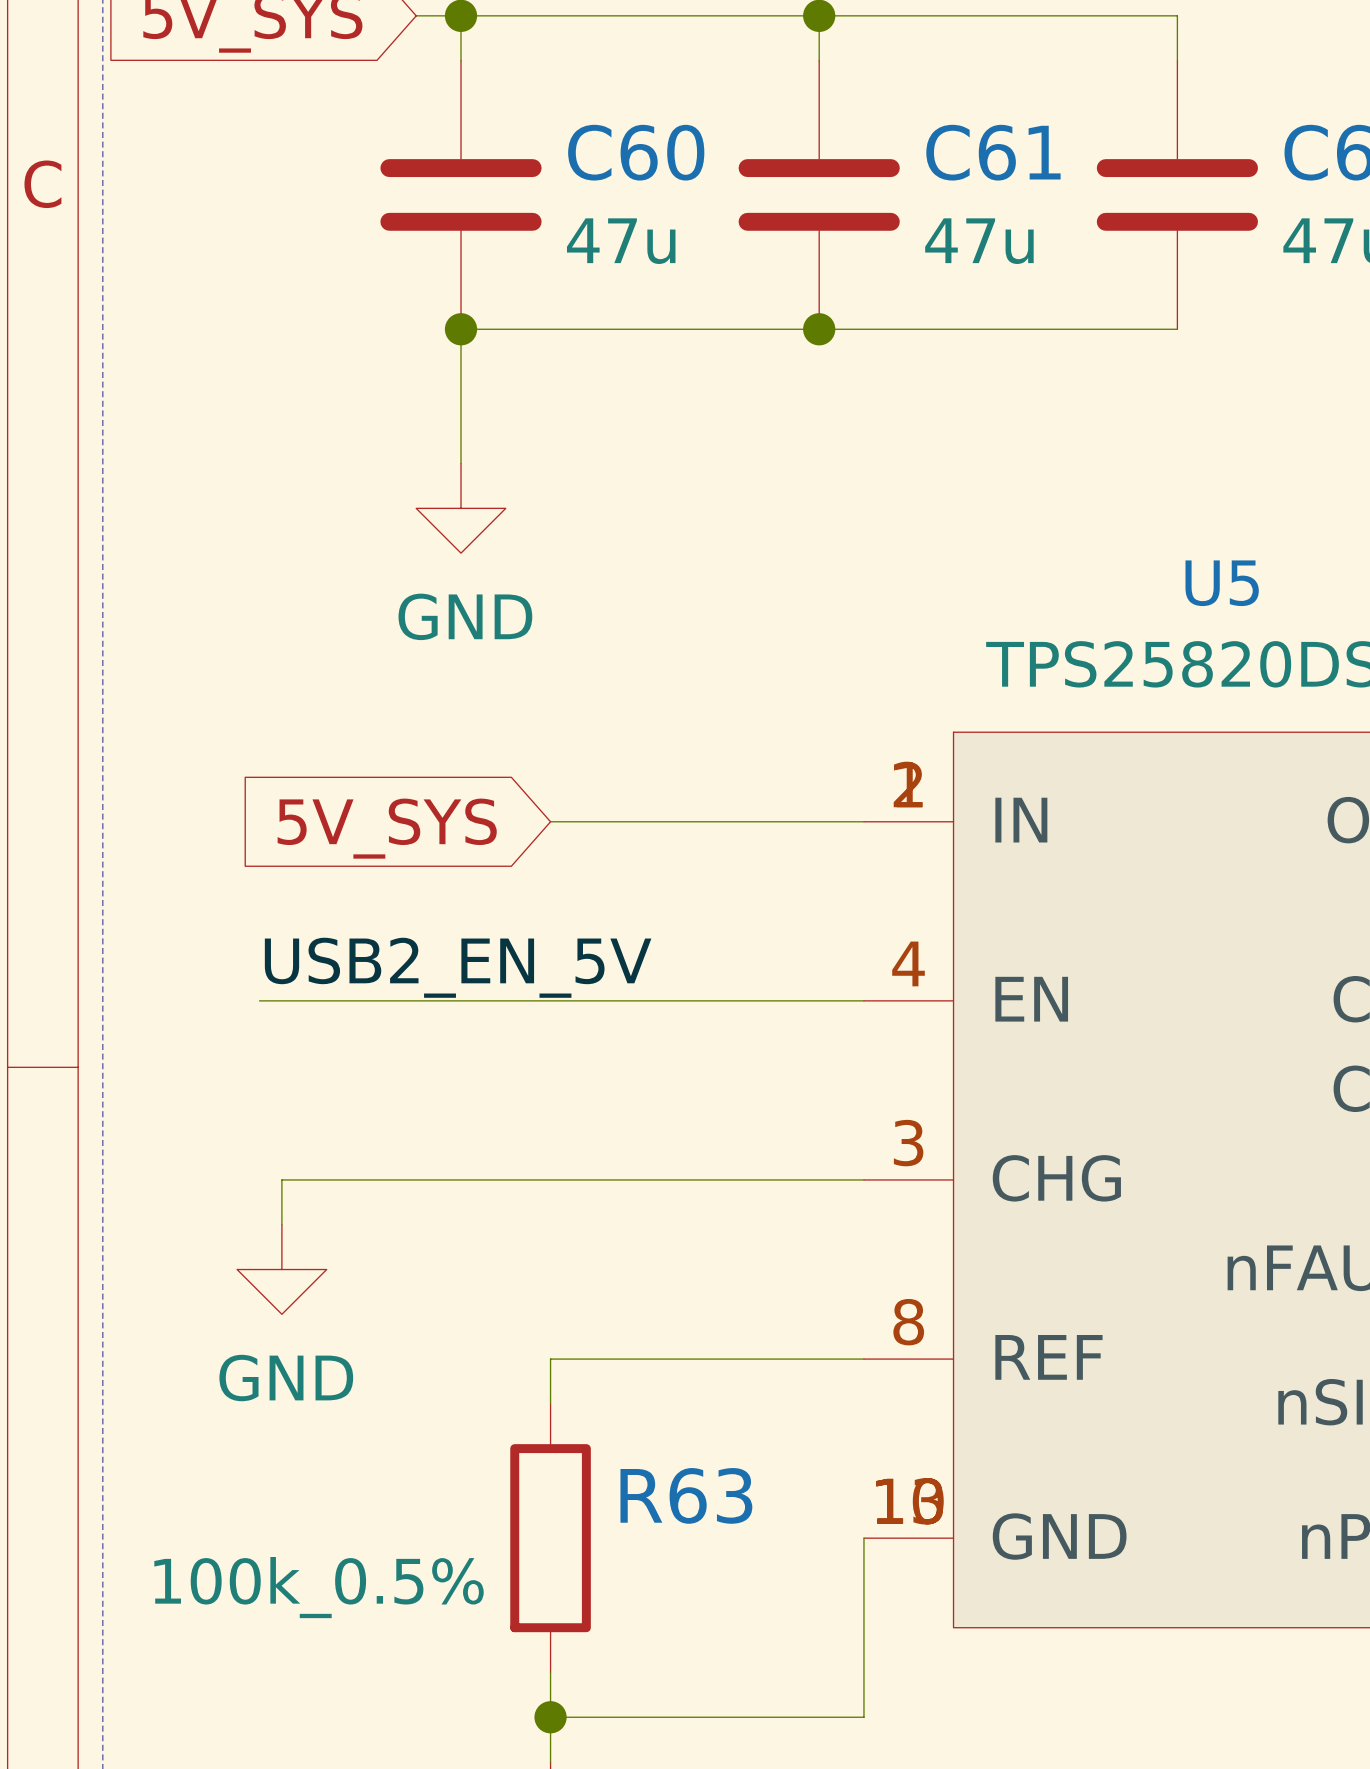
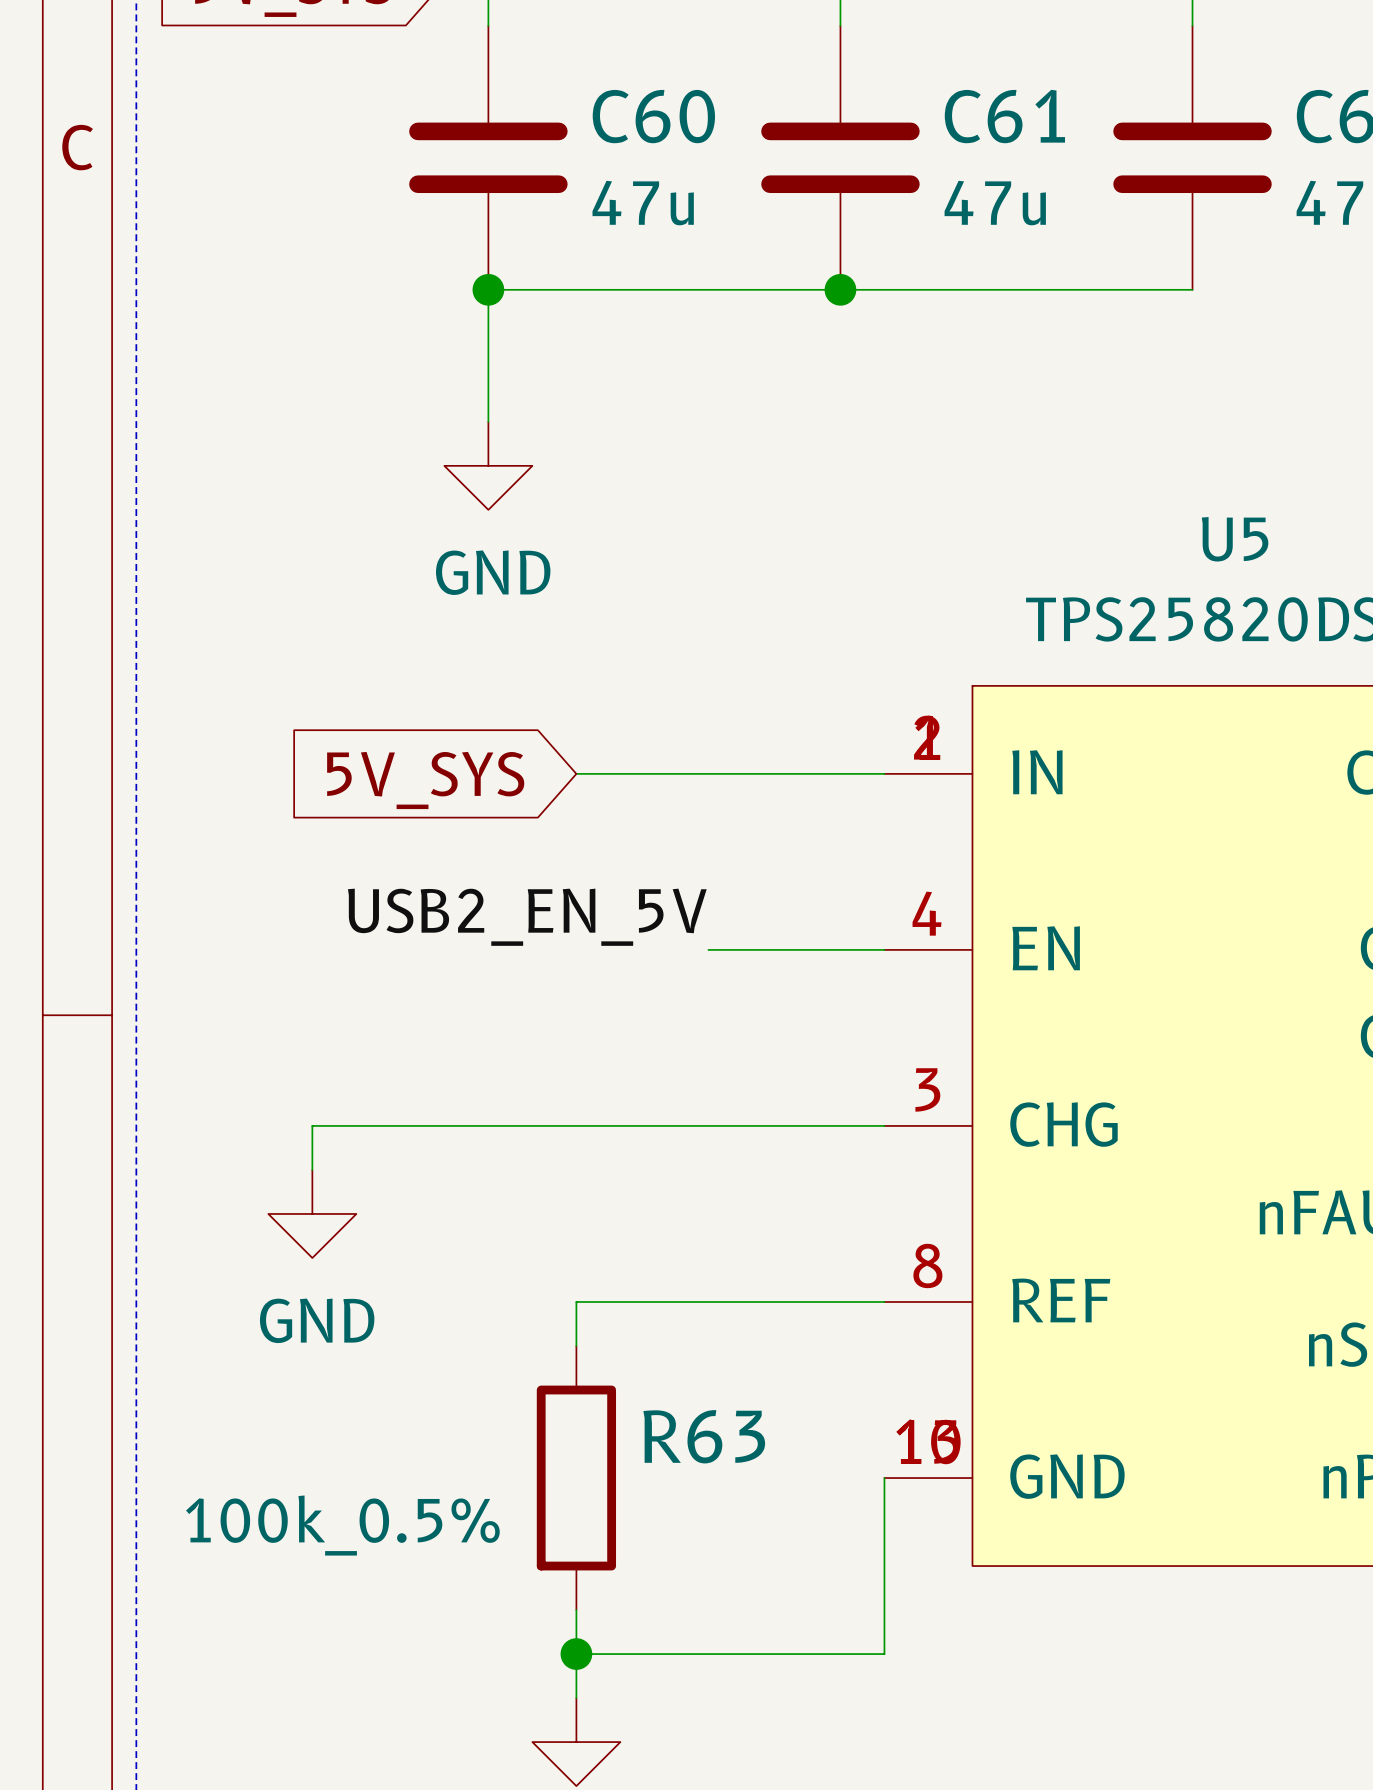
label position: USB2_EN_5V (458, 967) -> USB2_EN_5V (527, 917)
wire: (259, 1000) (684, 1000) -> none

